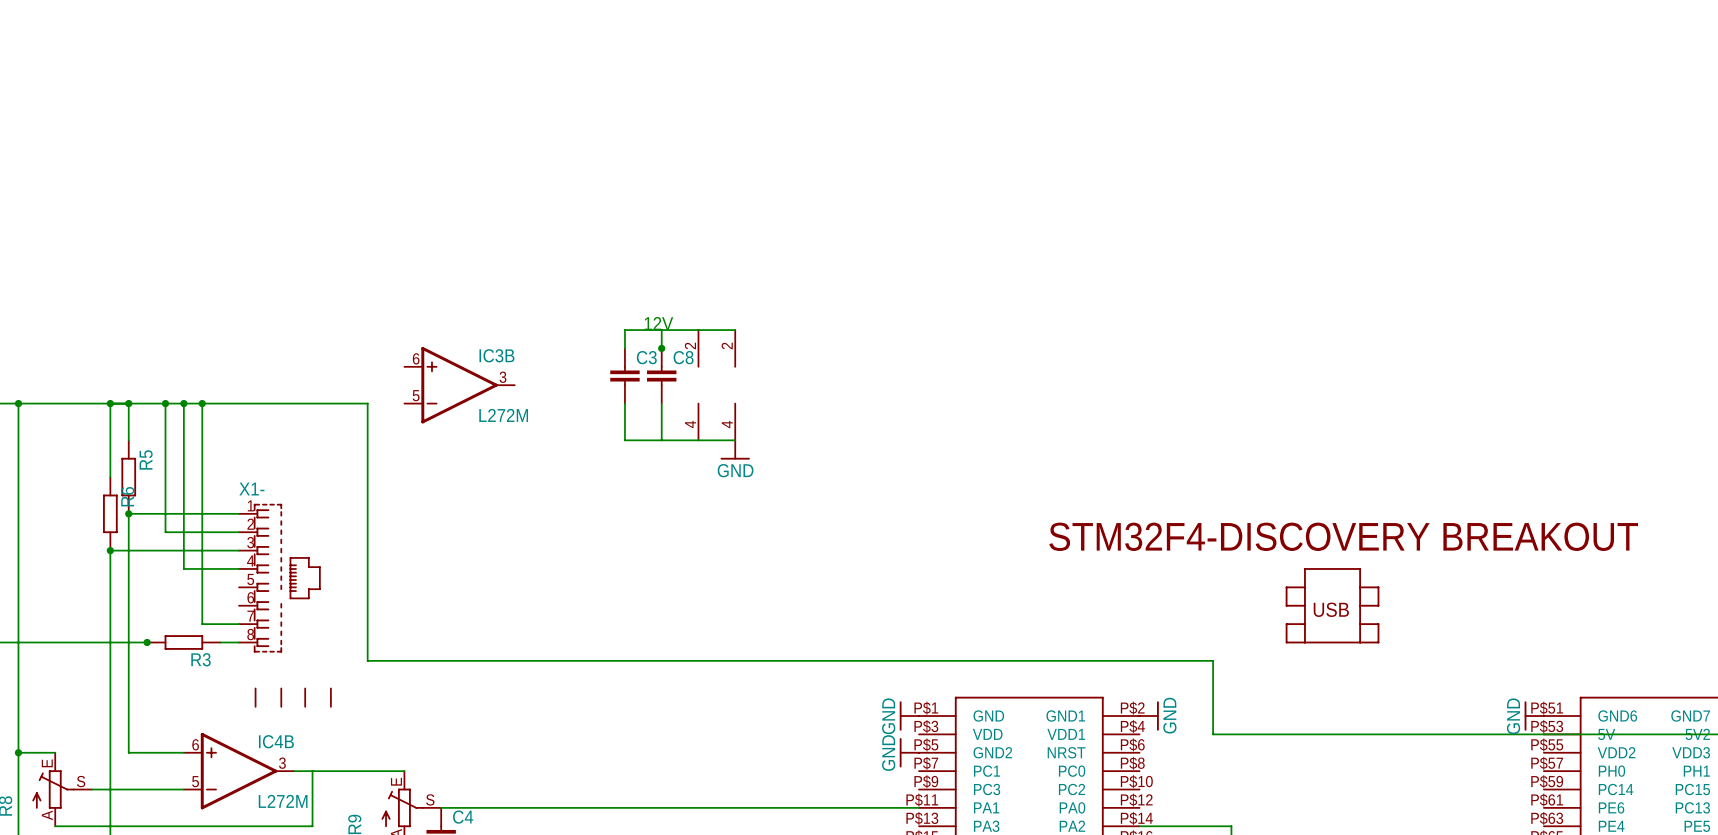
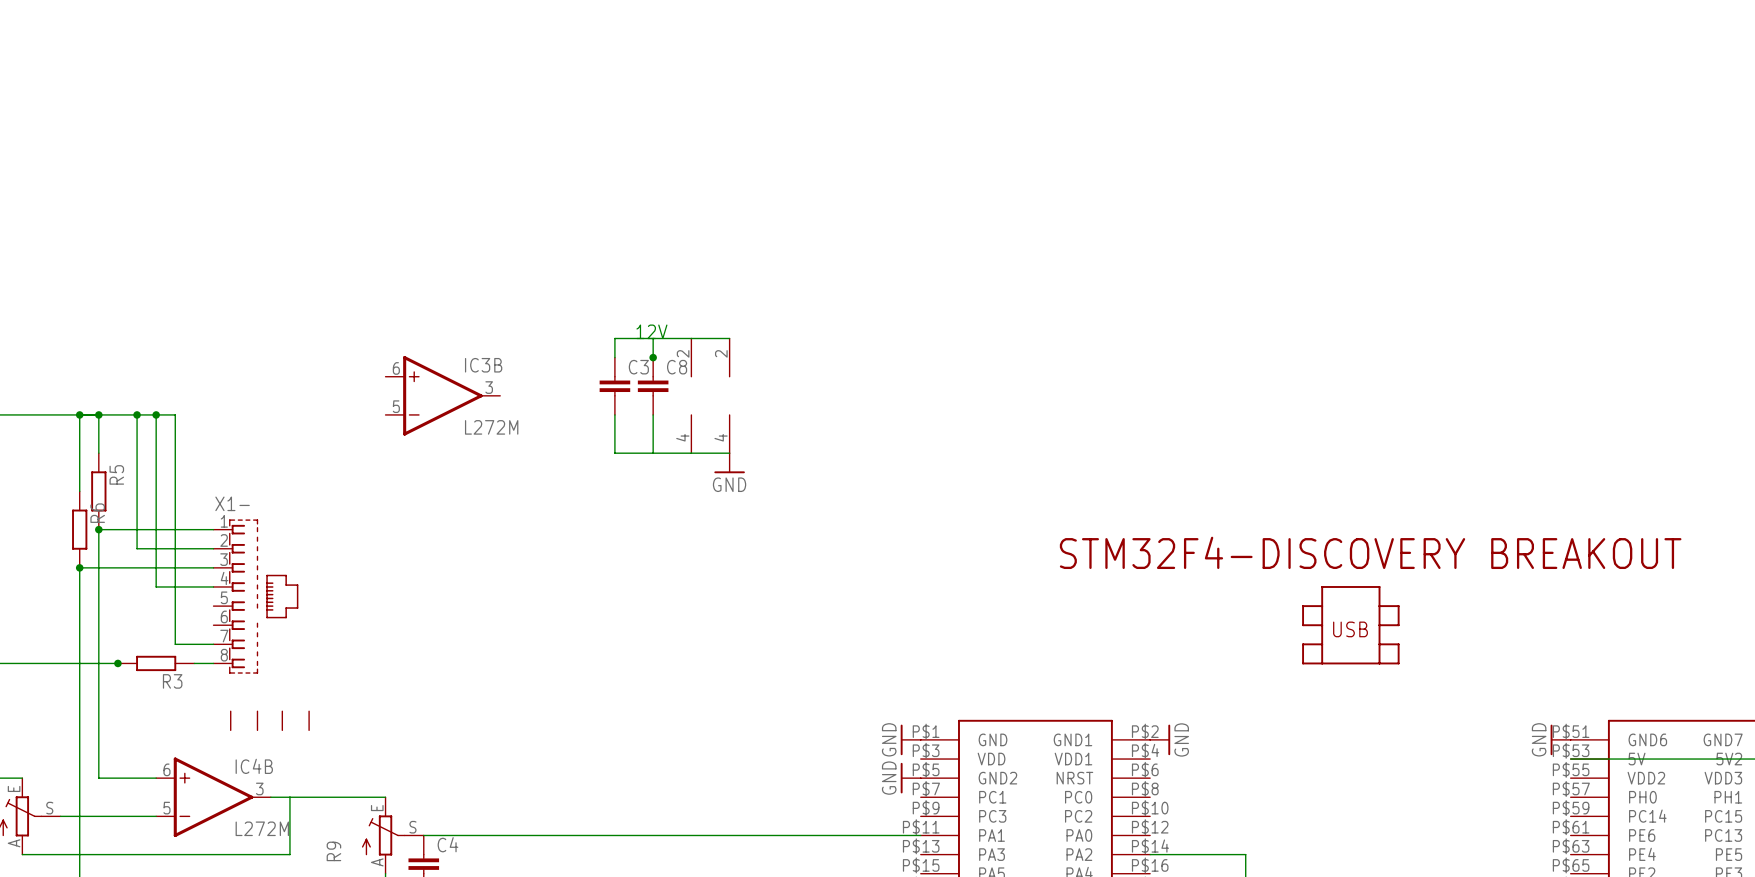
wire: (202, 403) (367, 403) (367, 660) (1213, 660) (1213, 734) (1543, 734) -> none
junction: (202, 403) -> none

